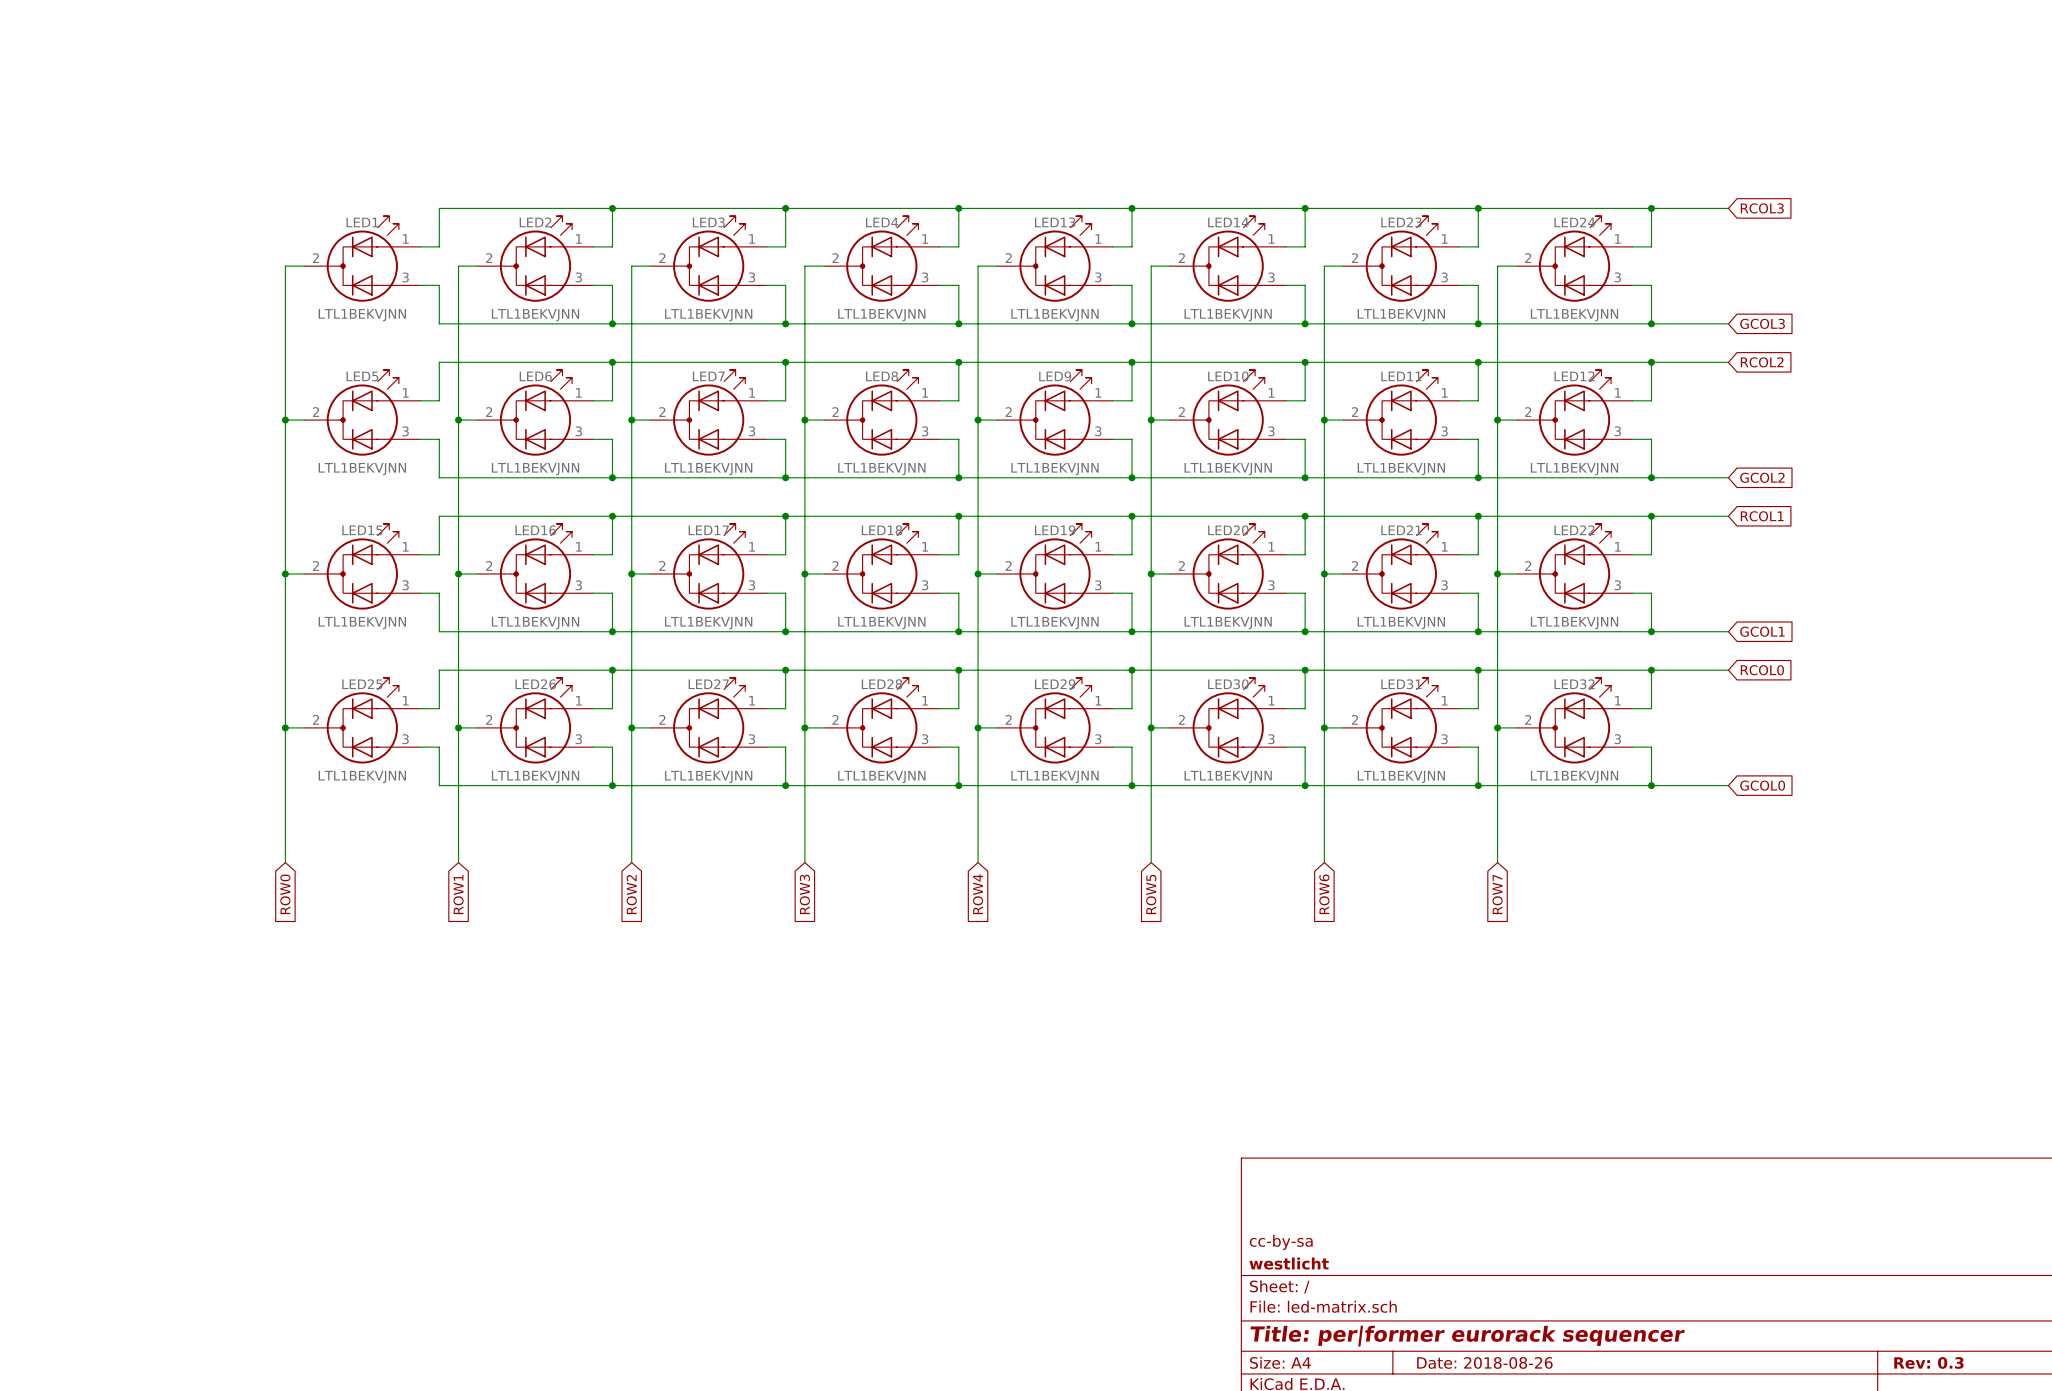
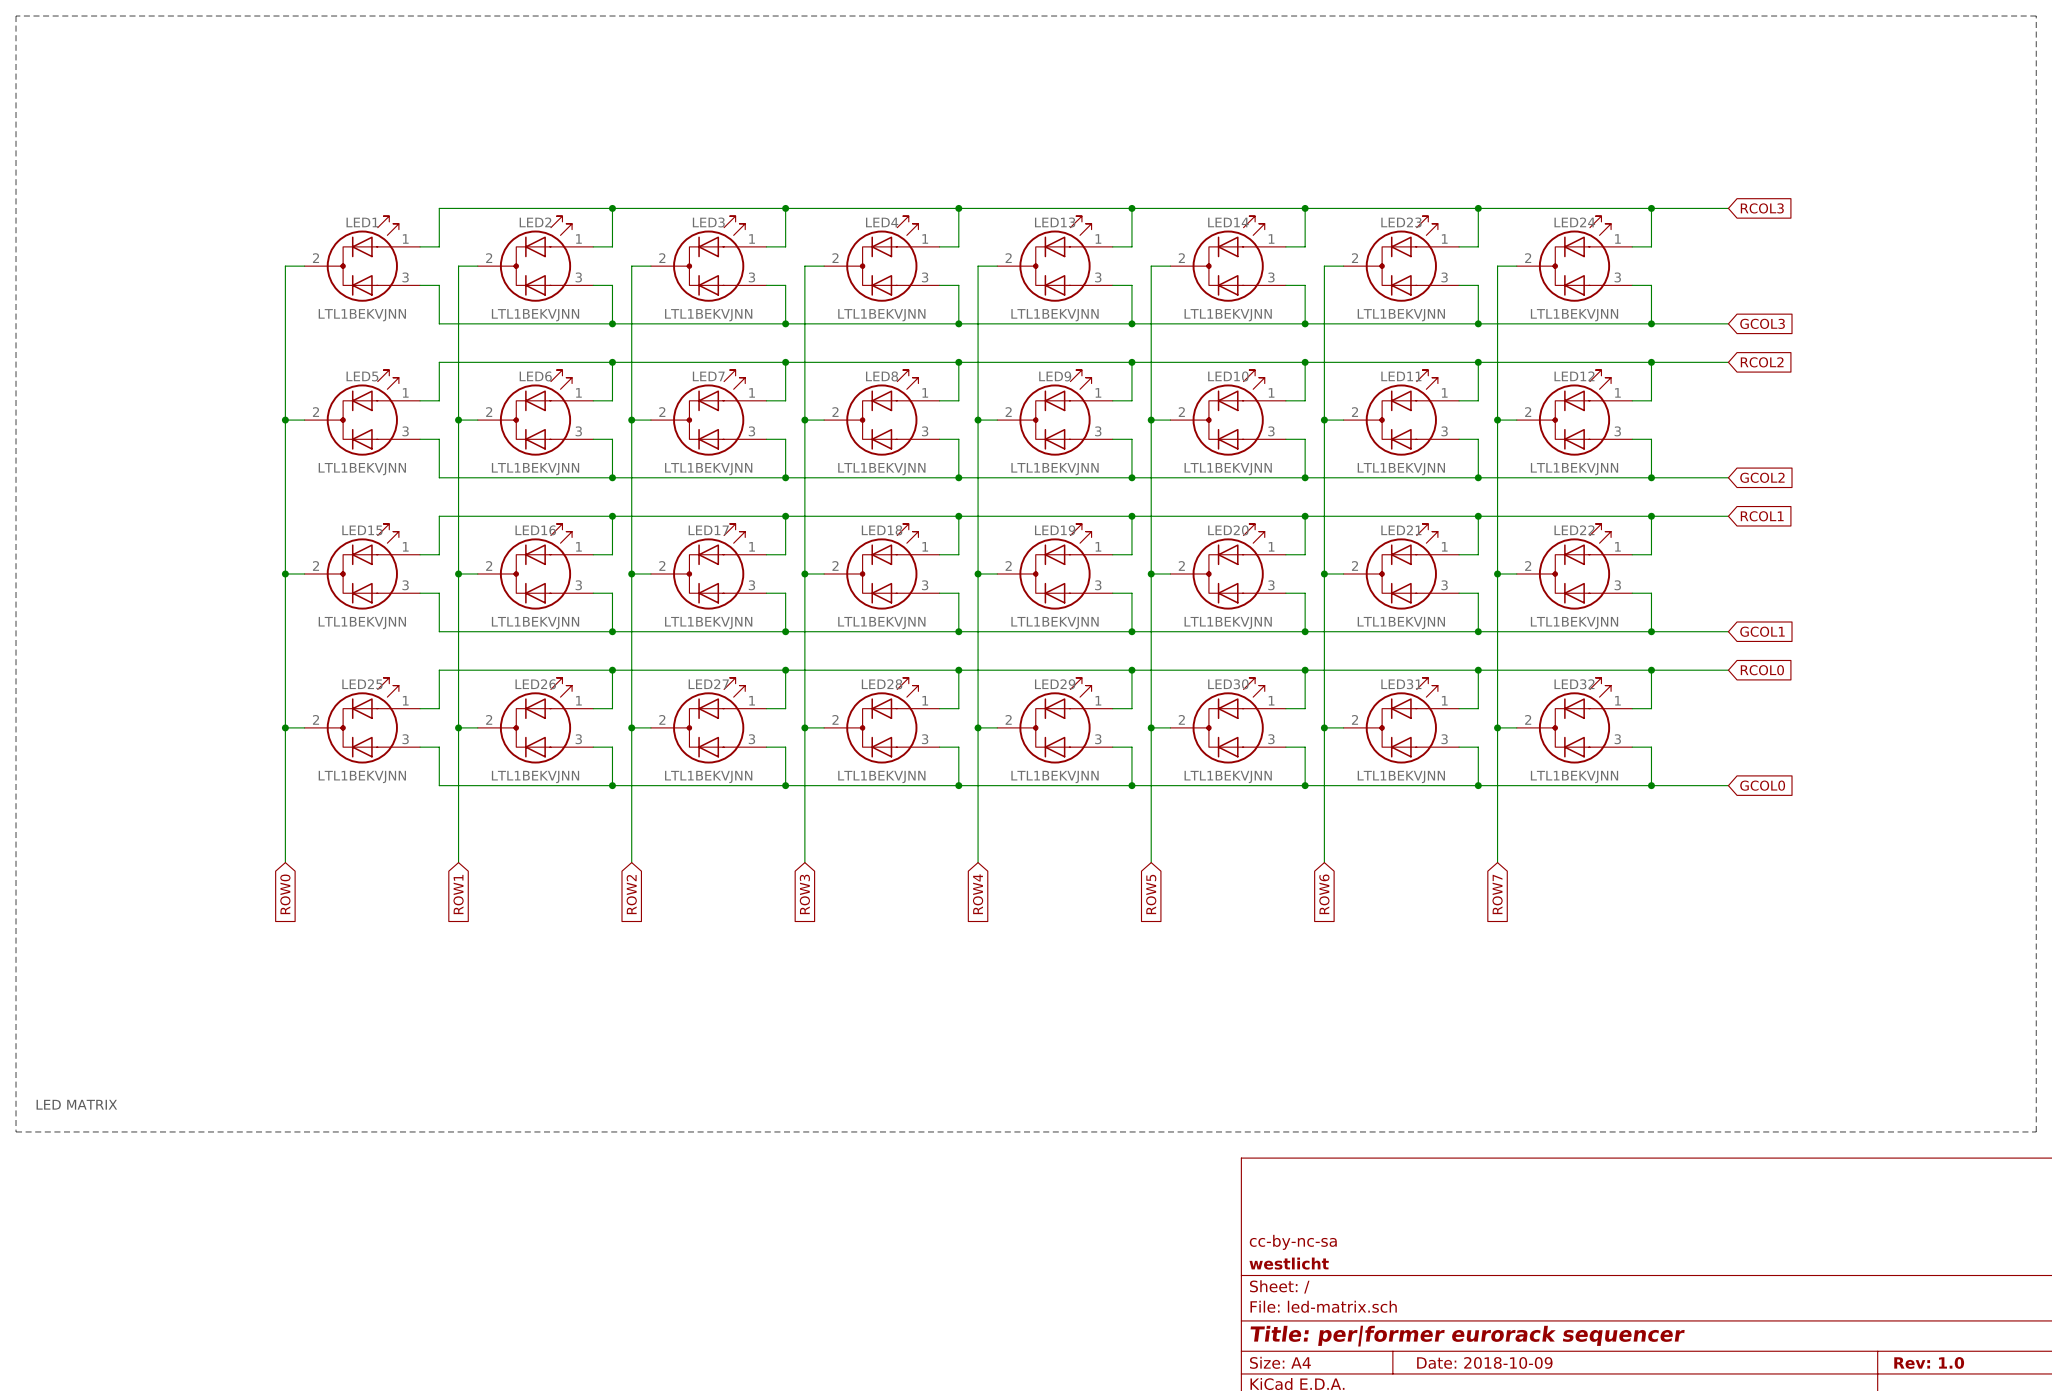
line: none -> (16, 16) (16, 1131) (2036, 1131) (2036, 16) (16, 16)
text: none -> LED MATRIX (76, 1104)
title block: cc-by-sa (1281, 1242) -> cc-by-nc-sa (1293, 1242)
title block: Date: 2018-08-26 (1484, 1362) -> Date: 2018-10-09 (1484, 1362)
title block: Rev: 0.3 (1928, 1362) -> Rev: 1.0 (1929, 1362)

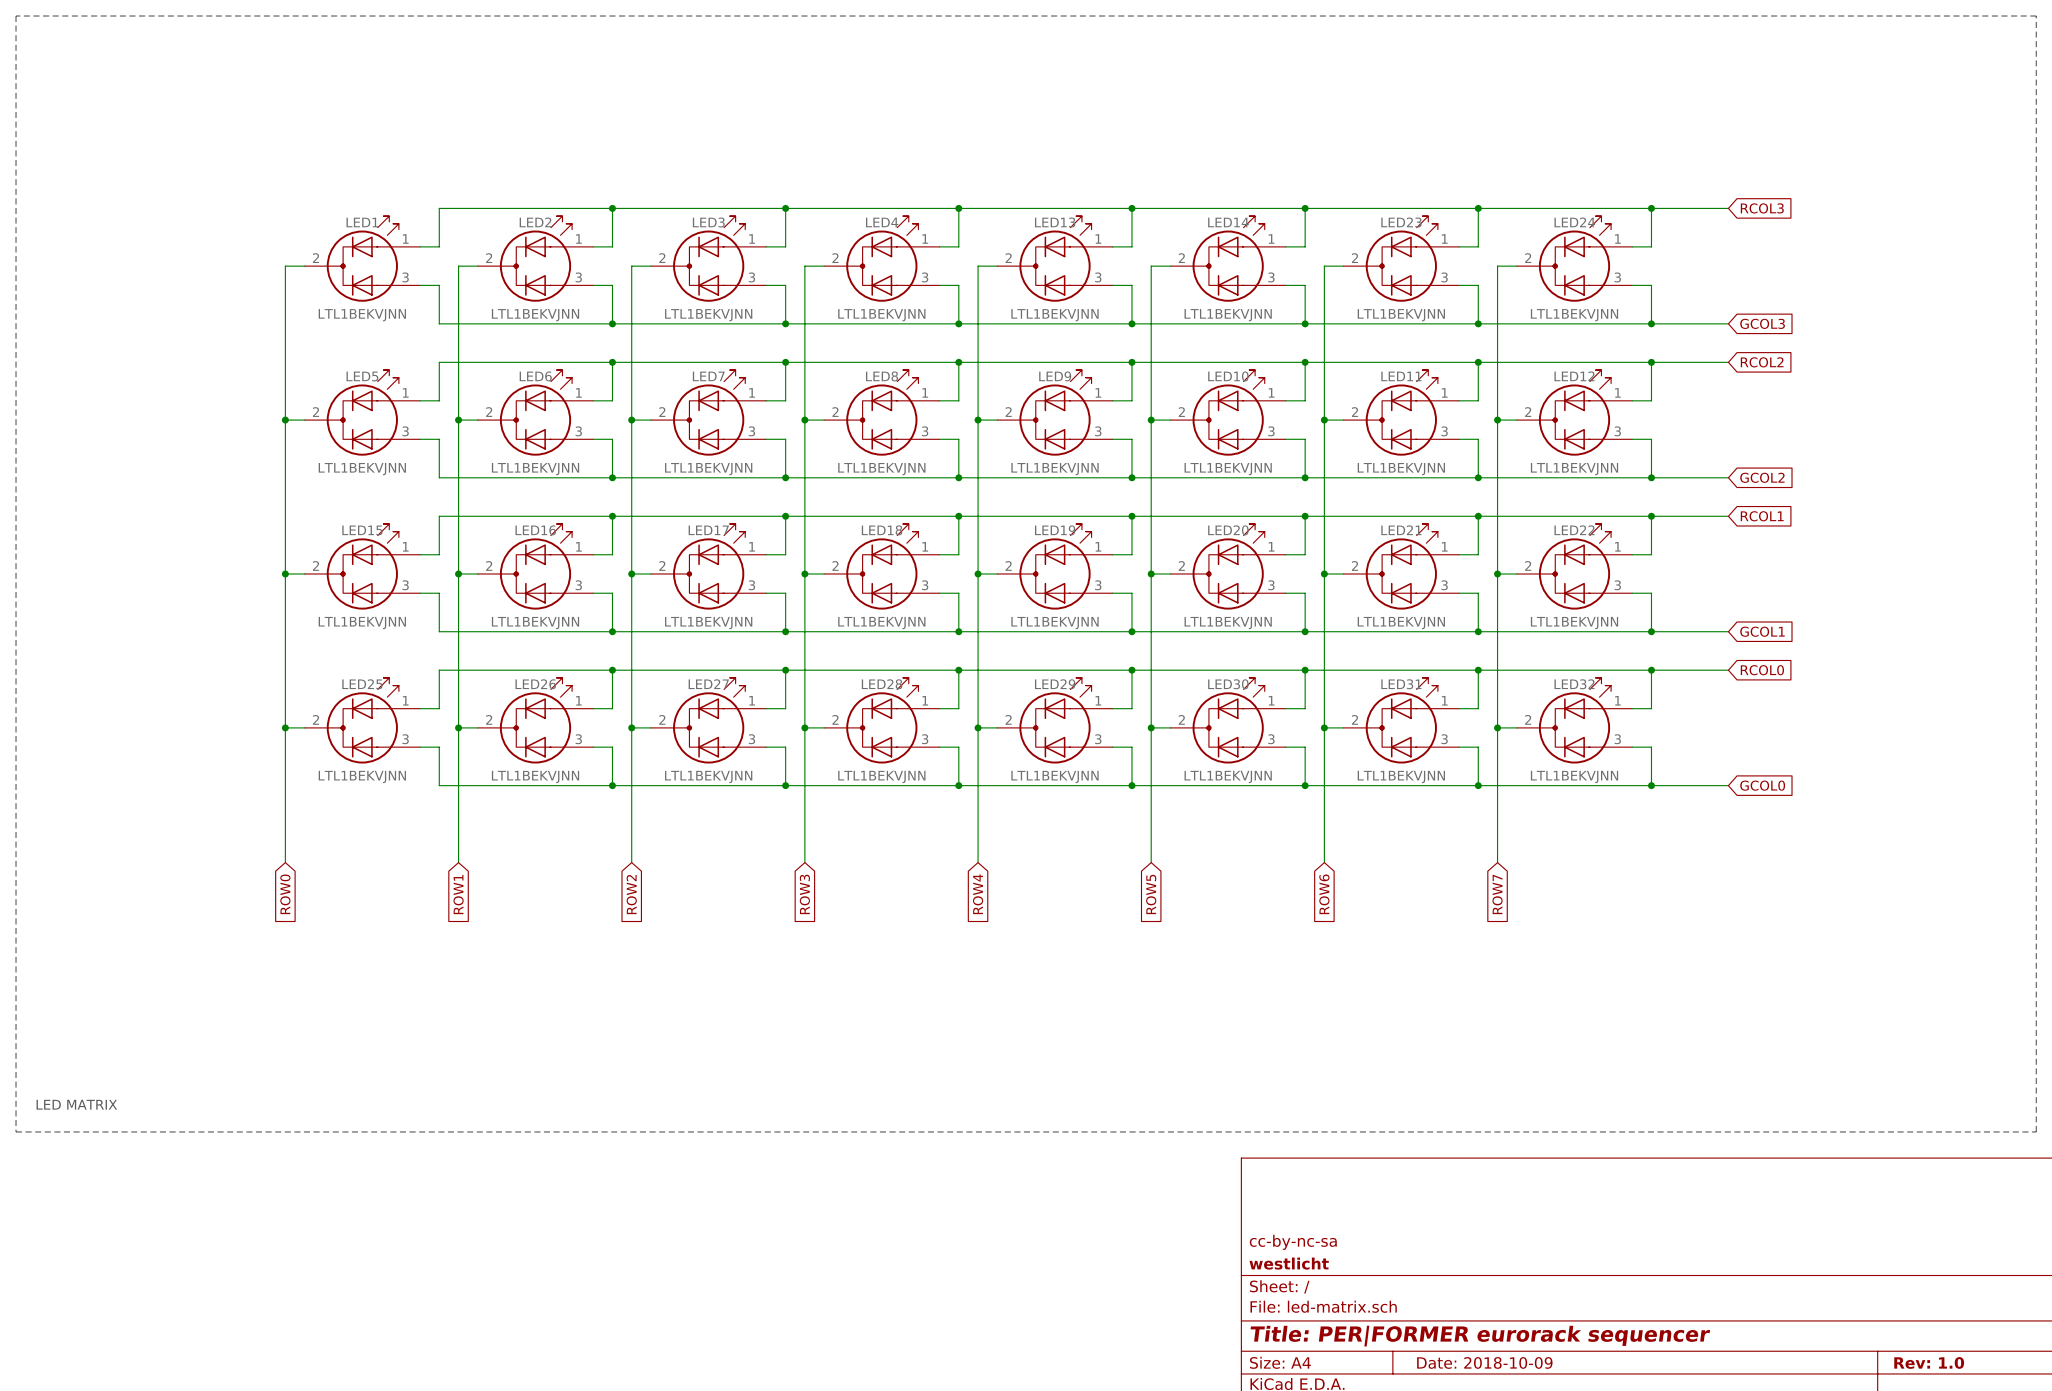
title block: Title: per|former eurorack sequencer (1467, 1336) -> Title: PER|FORMER eurorack sequencer (1480, 1336)

